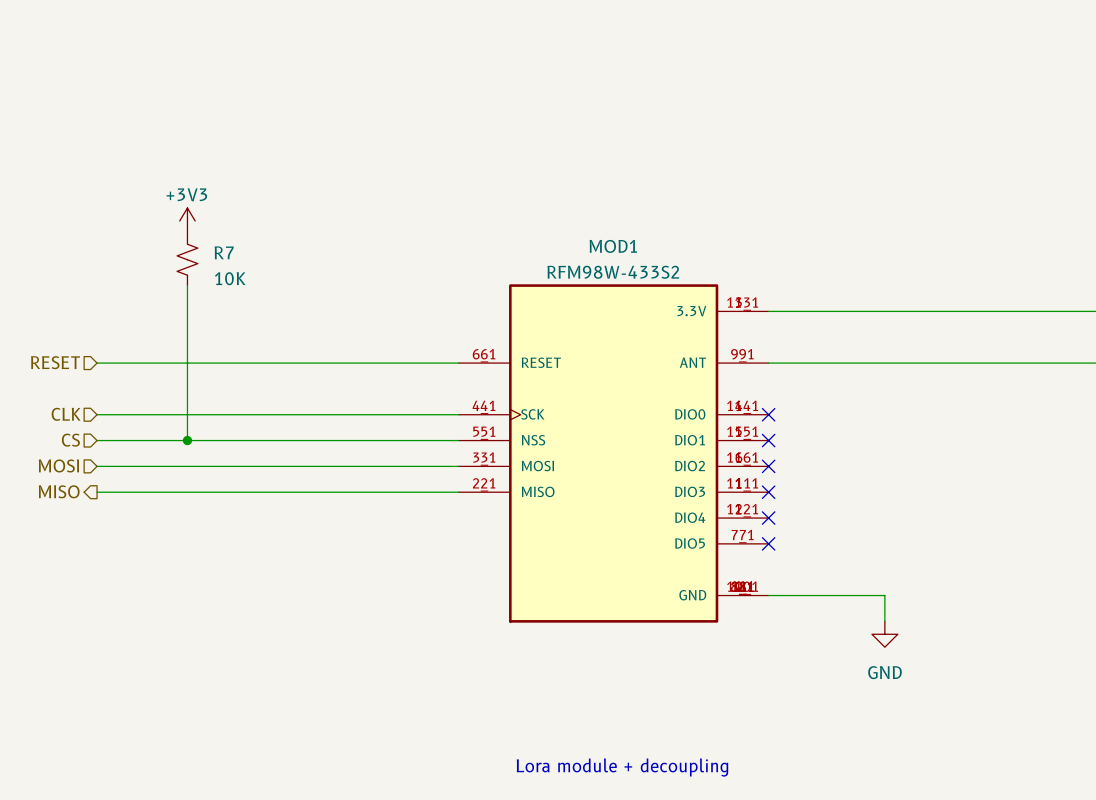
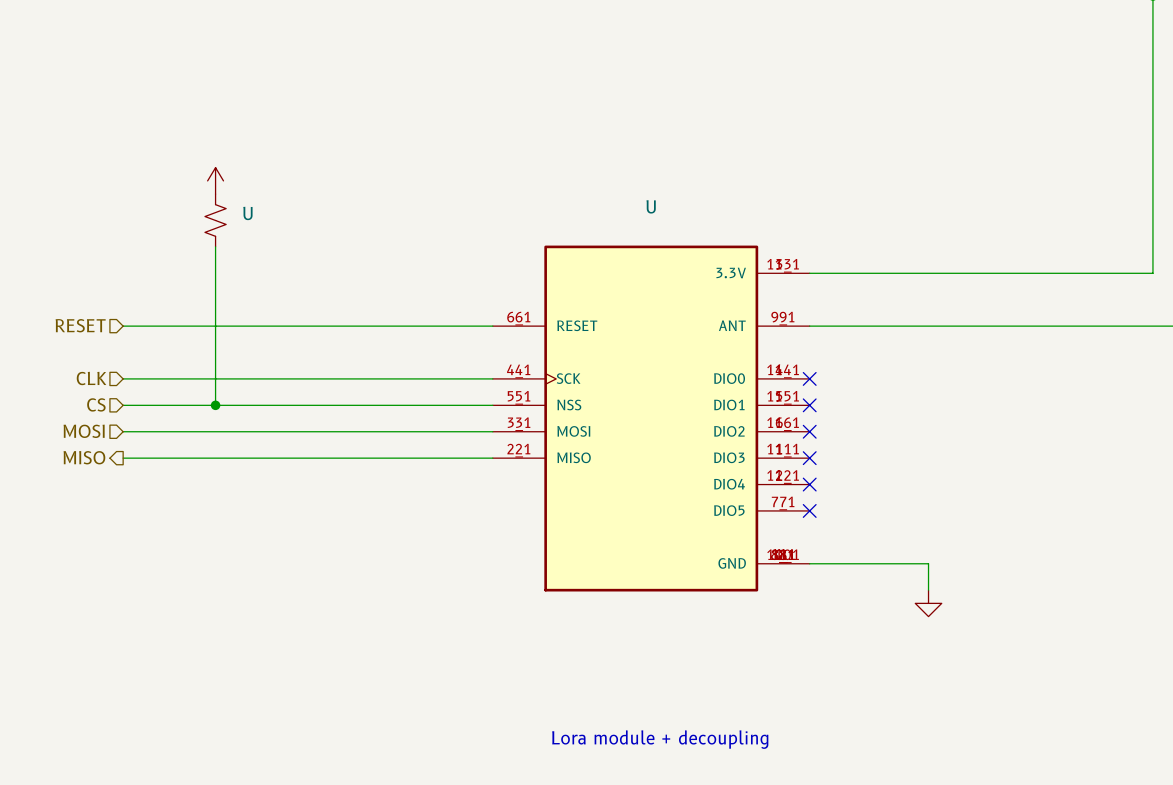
power symbol text: +3V3 (186, 194) -> none
MOD1 name: MOD1 (613, 246) -> U (651, 206)
R7 name: R7 (224, 252) -> U (247, 213)
MOD1 value: RFM98W-433S2 (613, 272) -> none
R7 value: 10K (230, 278) -> none
power symbol text: GND (884, 672) -> none

